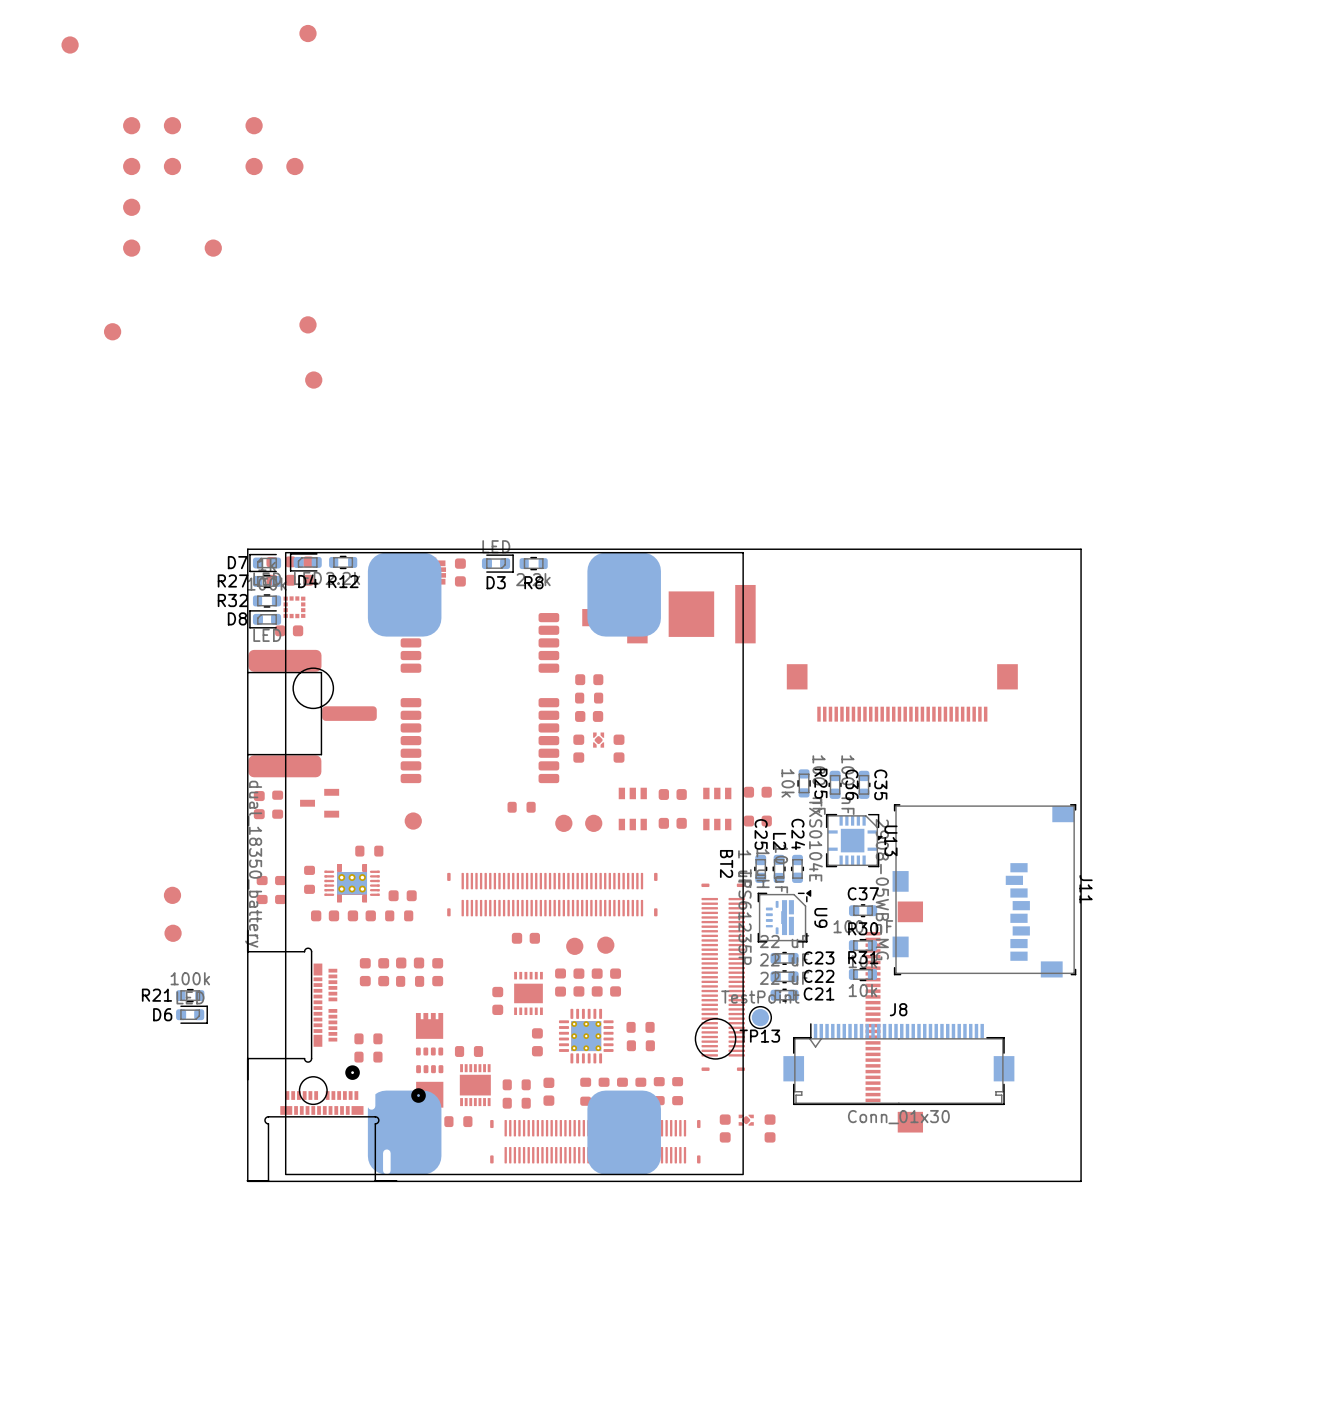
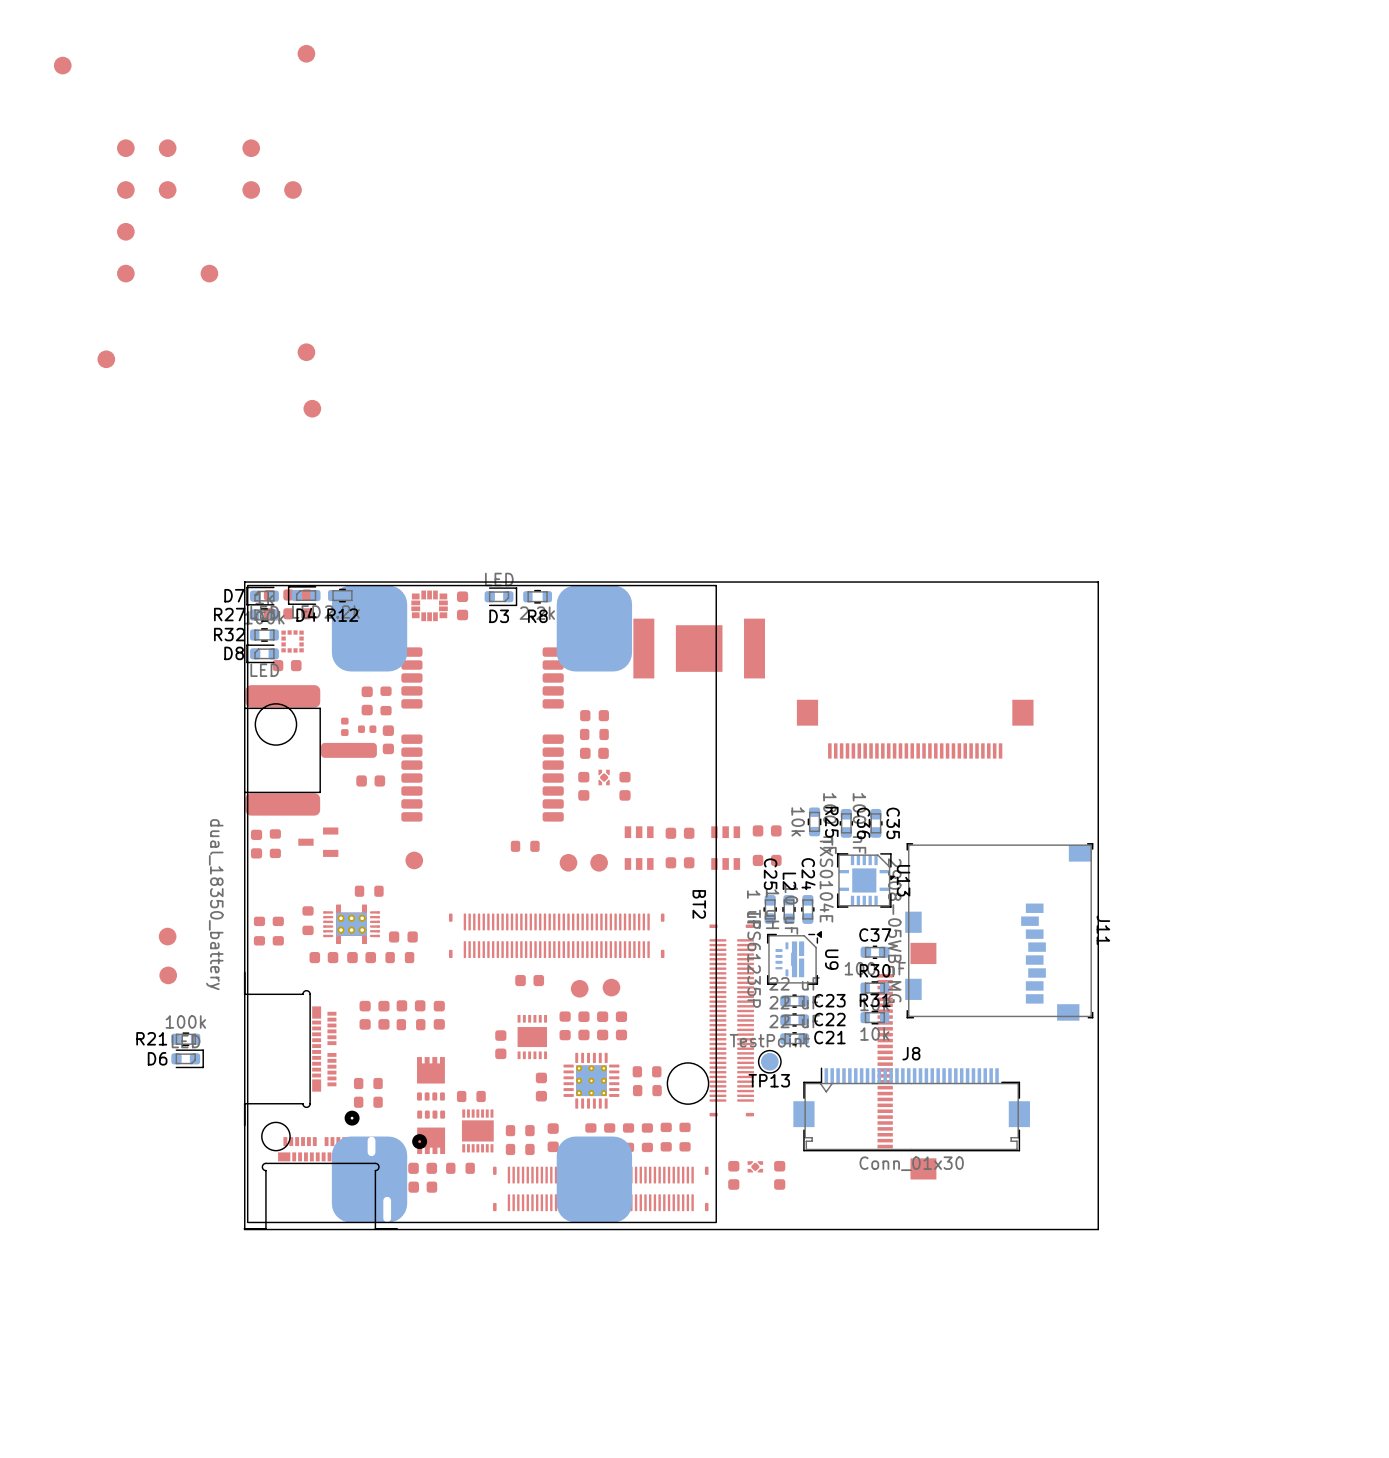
part: none -> (367, 700)
part: none -> (386, 700)
part: none -> (344, 726)
part: none -> (367, 729)
part: none -> (388, 739)
part: none -> (370, 780)
BT2 position: (514, 863) -> (481, 904)

